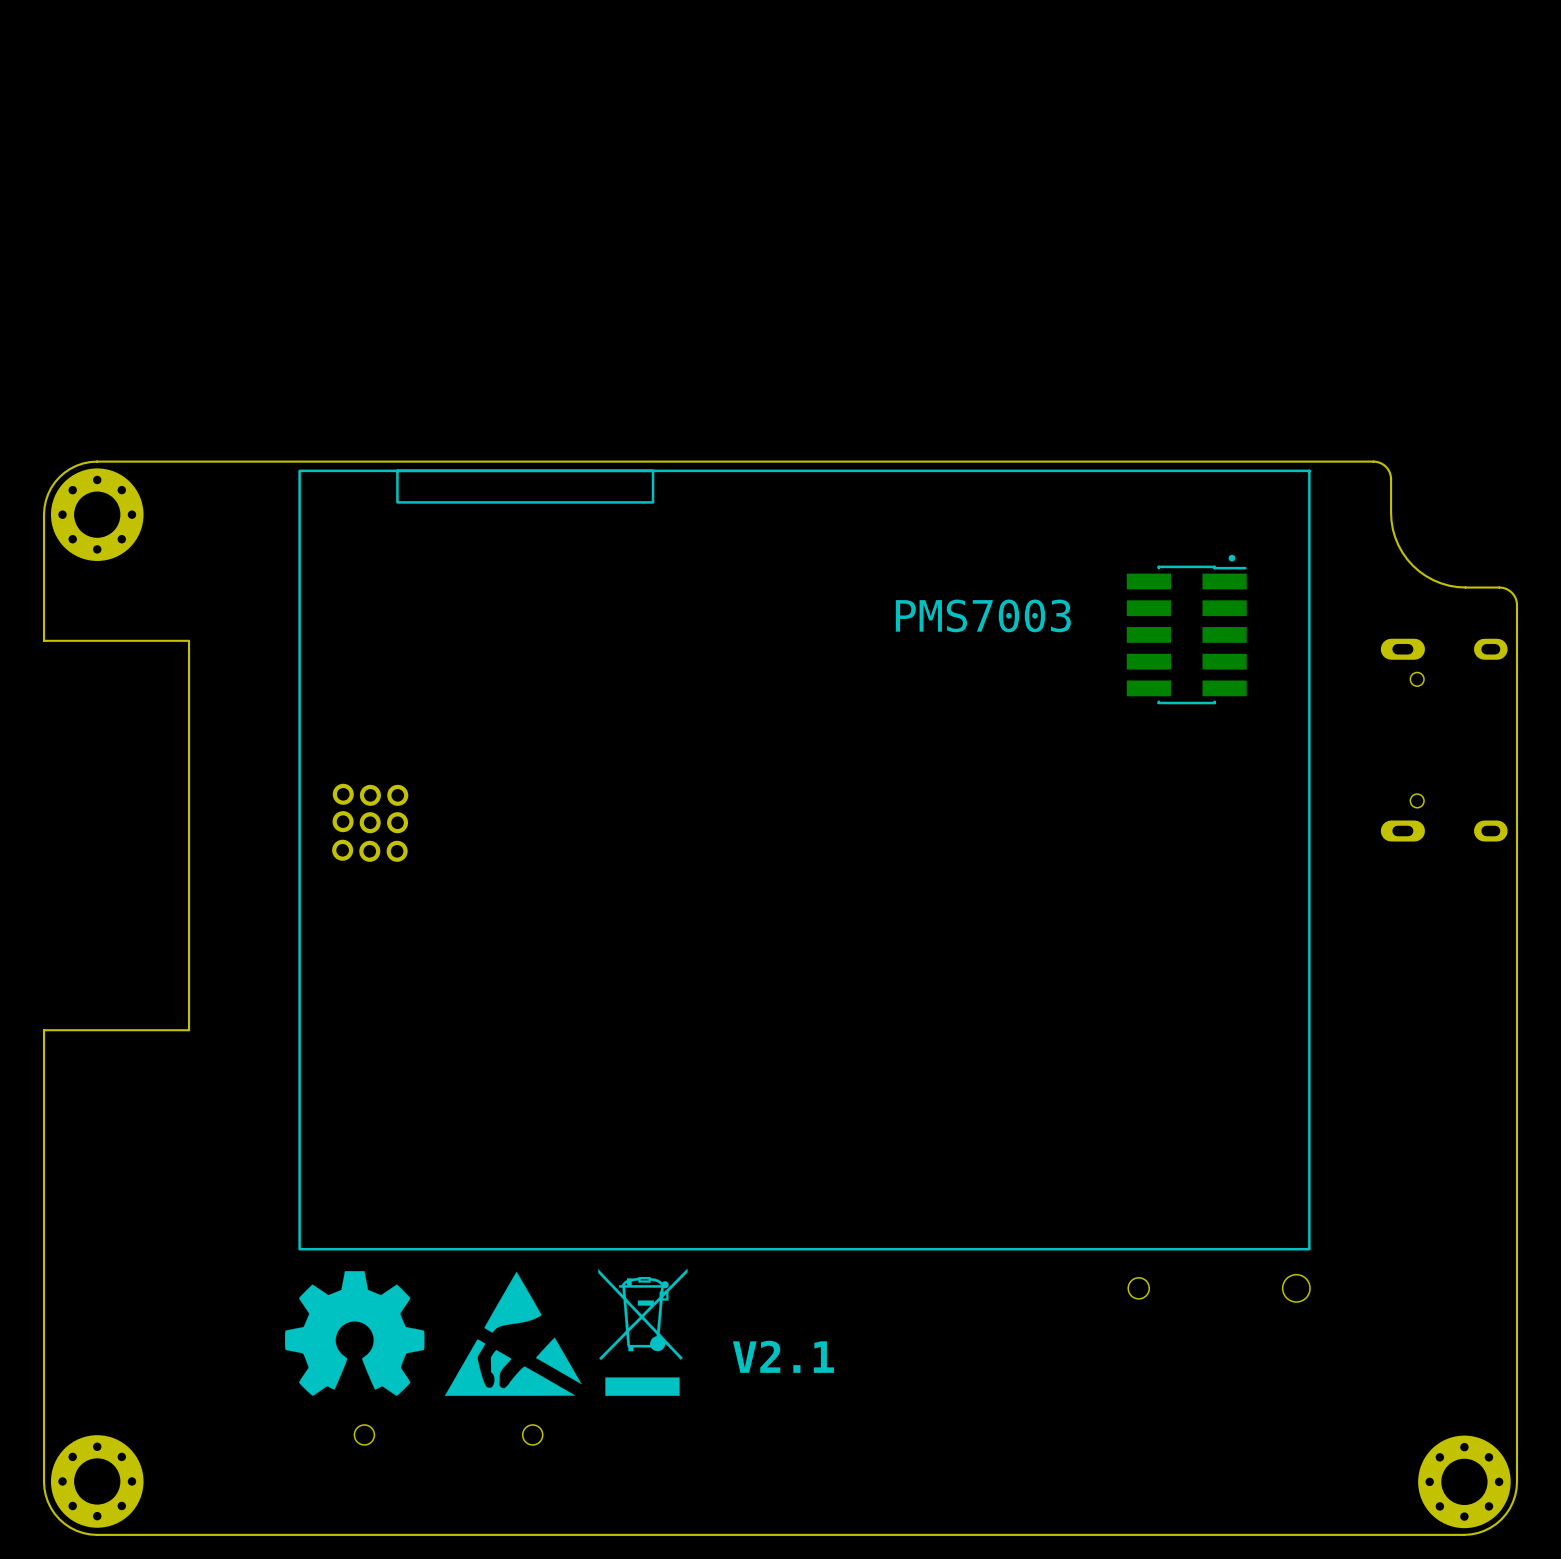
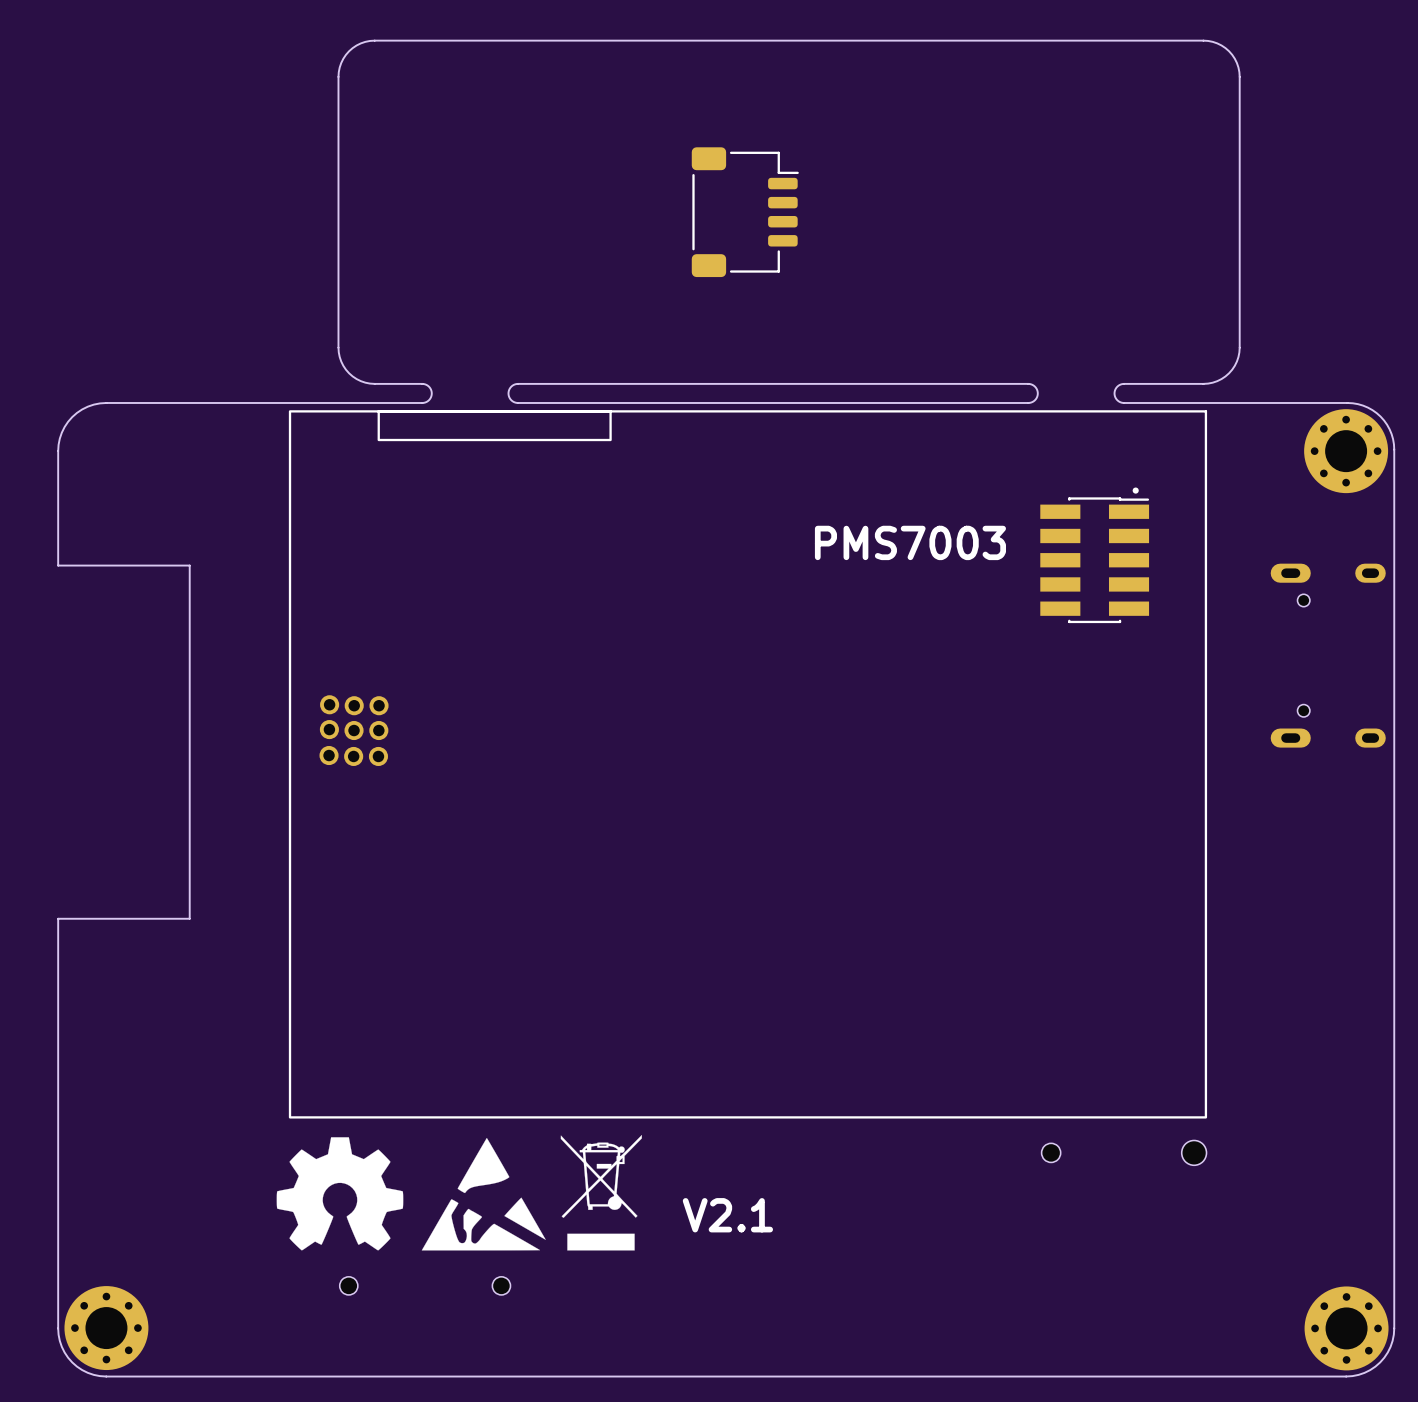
part: none -> (745, 212)
board edge: (551, 461) (445, 461) -> (518, 402) (511, 400) (508, 393) (511, 386) (518, 383) (1028, 383) (1034, 386) (1037, 393) (1034, 400) (1028, 402)
board edge: (1219, 461) (1113, 461) -> (1124, 402) (1118, 401) (1114, 395) (1115, 389) (1120, 384) (1212, 382) (1229, 373) (1238, 357) (1239, 72) (1236, 63) (1229, 51) (1212, 41) (374, 40) (360, 43) (345, 54) (338, 72) (338, 352) (345, 369) (360, 381) (370, 383) (427, 385) (431, 390) (431, 396) (427, 401) (422, 402)
board edge: (1373, 461) (1384, 465) (1390, 473) (1392, 529) (1398, 545) (1412, 565) (1433, 580) (1449, 585) (1505, 588) (1513, 594) (1517, 605) -> (1264, 402) (1352, 403) (1367, 407) (1380, 416) (1389, 429) (1393, 444) (1394, 533)
part: (97, 514) -> none
part: none -> (1346, 451)

